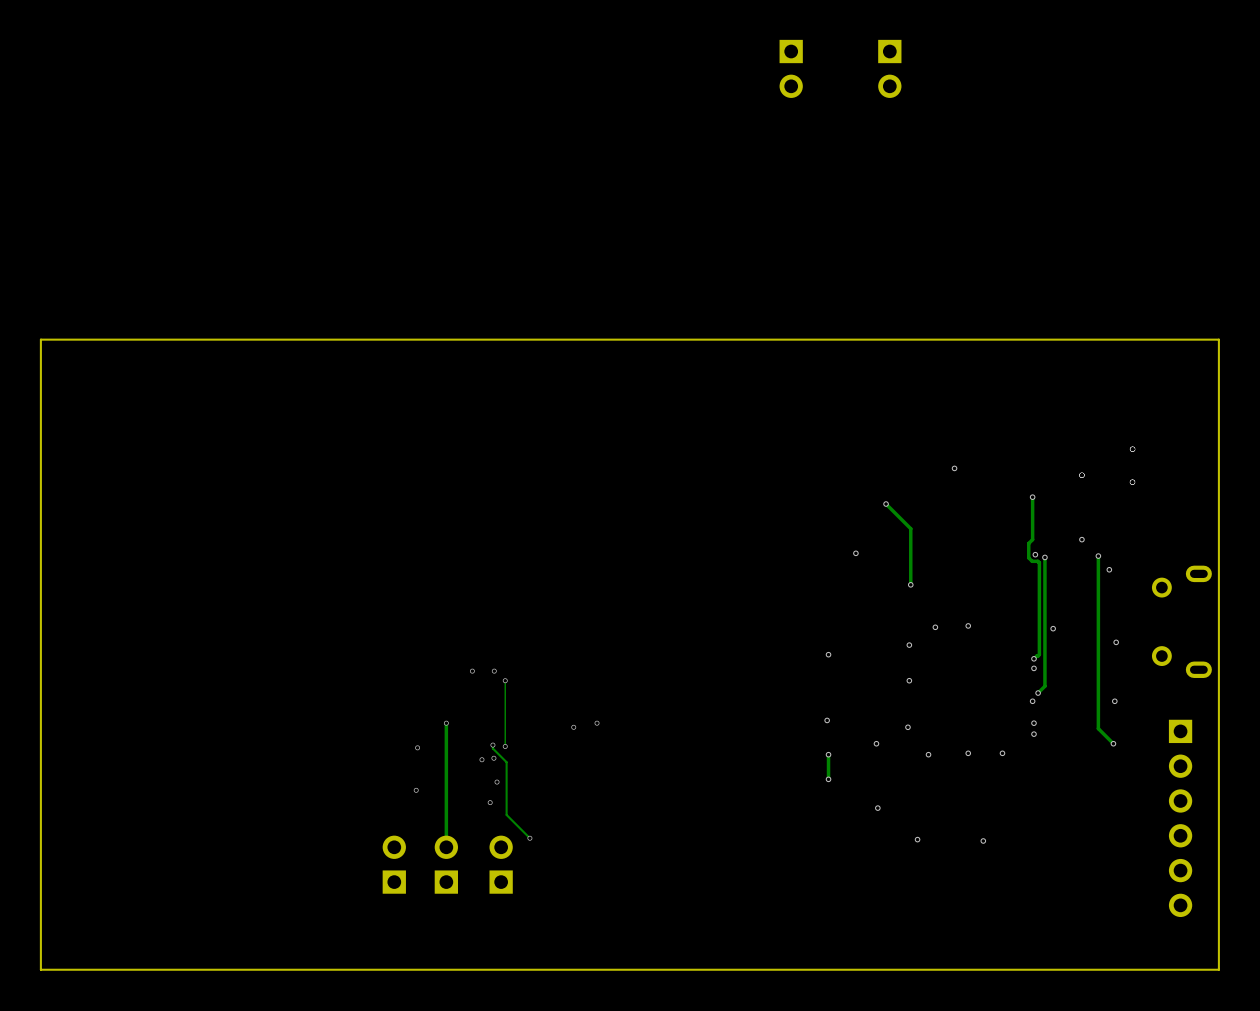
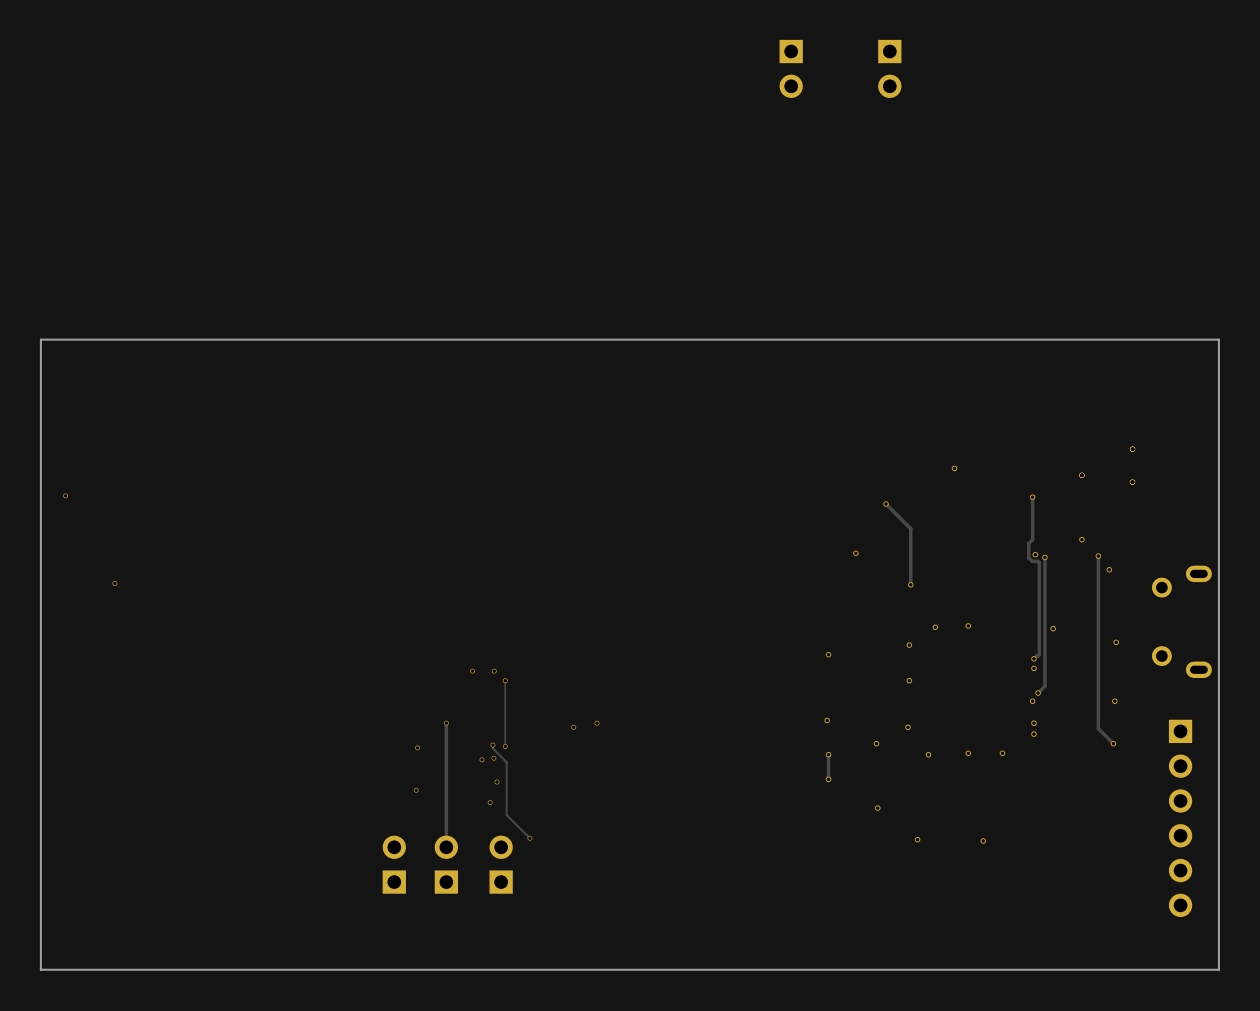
via: none -> (65, 495)
via: none -> (114, 583)

